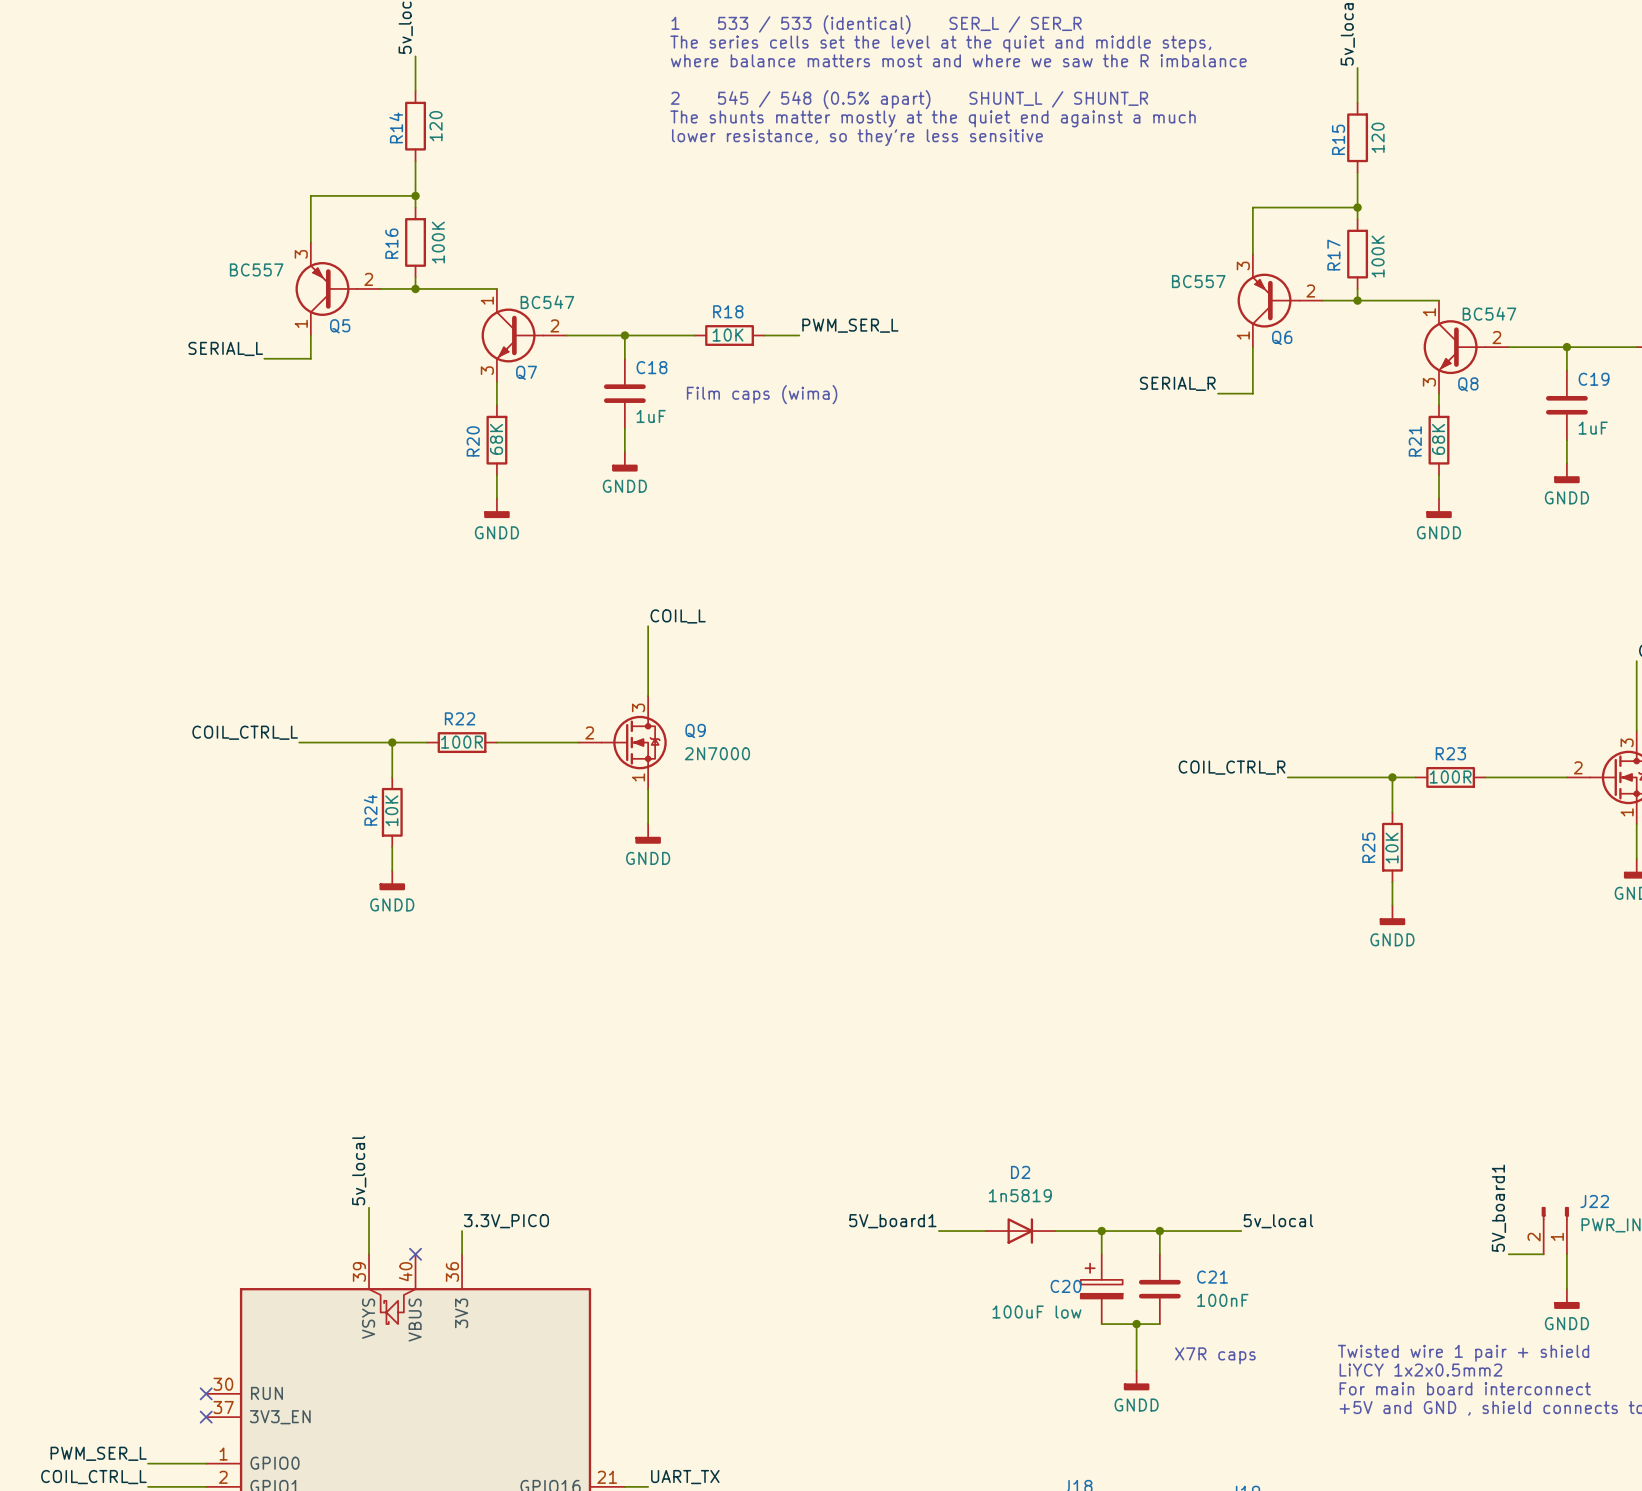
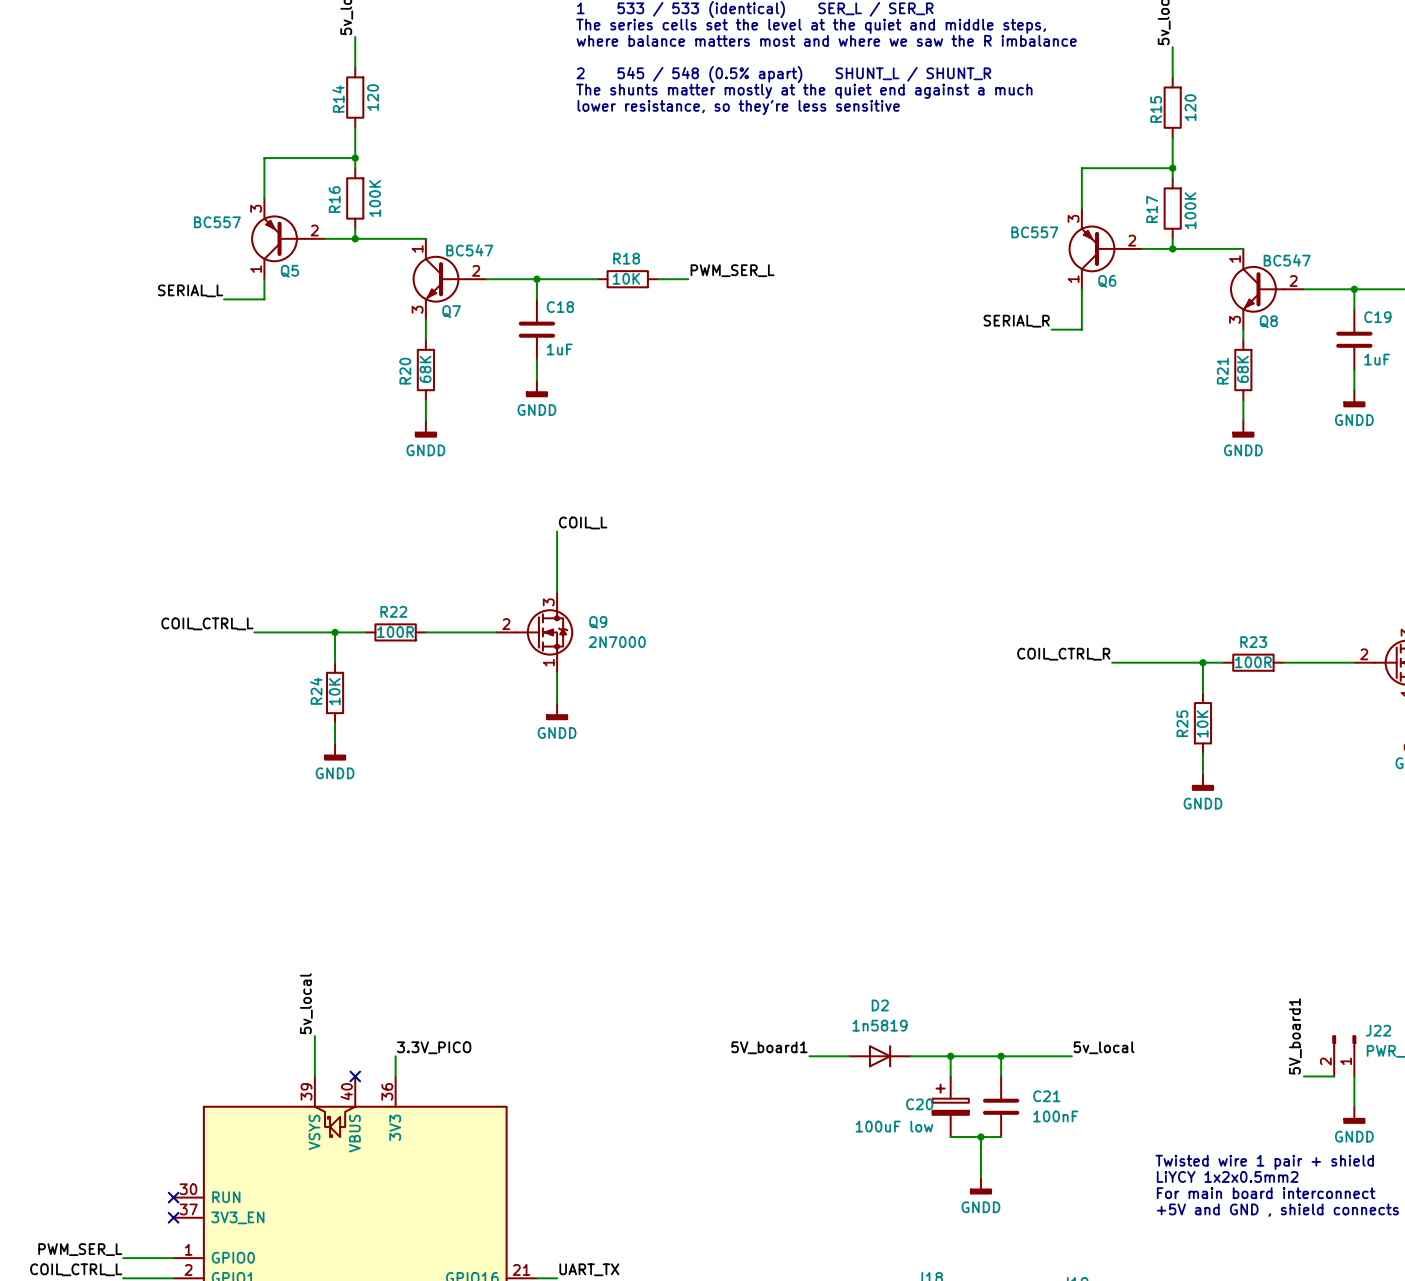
text: Film caps (wima) (762, 394) -> none
text: X7R caps (1215, 1355) -> none

